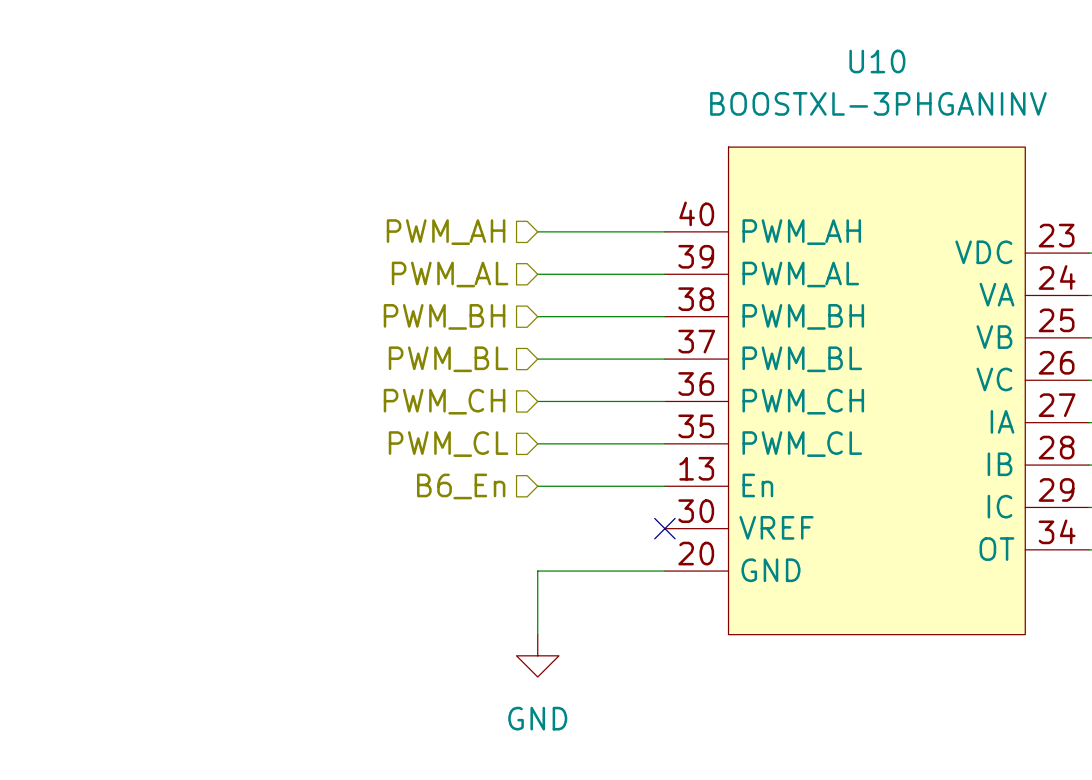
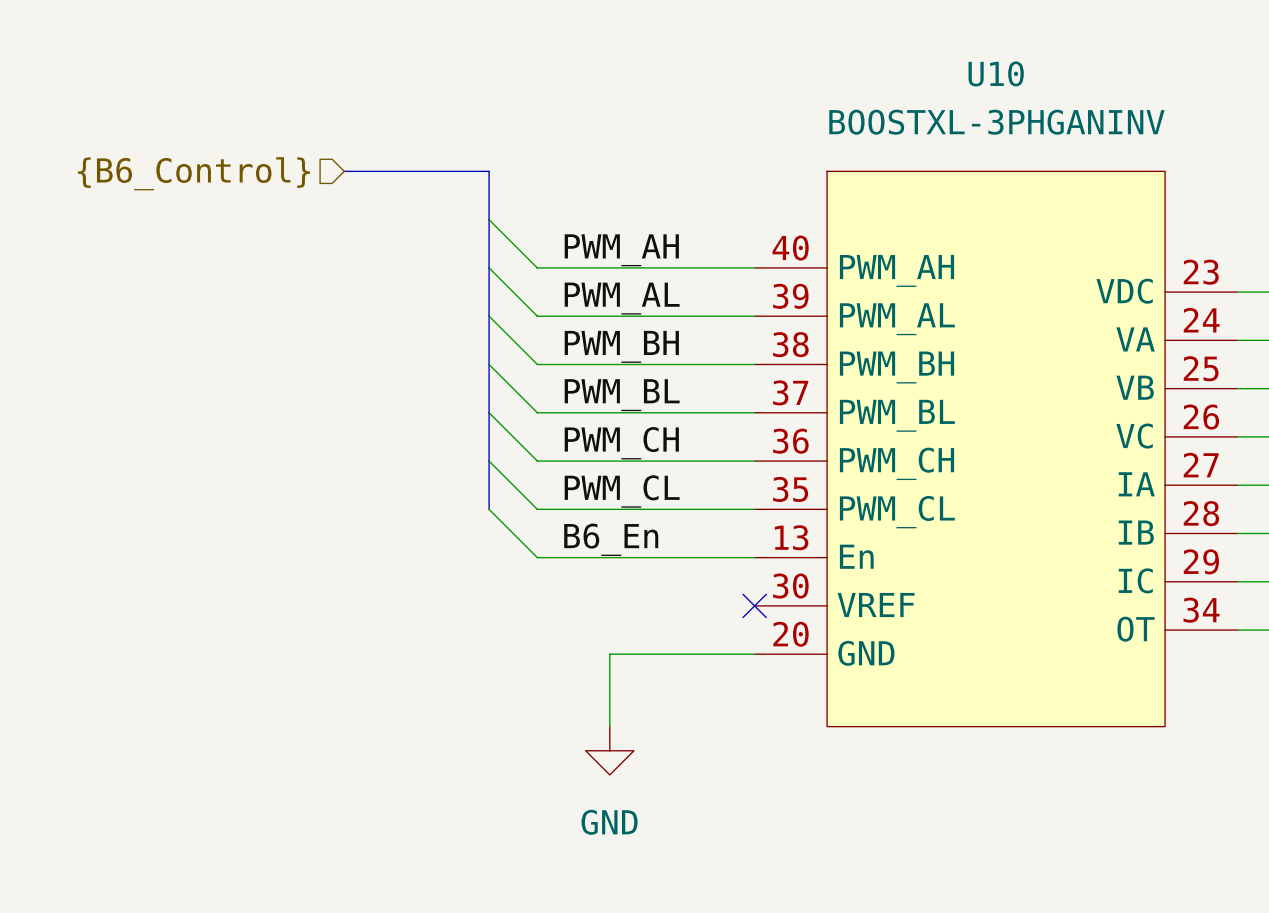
bus: none -> (344, 171) (489, 171) (489, 509)
hierarchical label: none -> {B6_Control} (193, 173)
wire: none -> (489, 219) (537, 267) (609, 267)
label: none -> PWM_AH (621, 250)
wire: none -> (489, 267) (537, 316) (609, 316)
hierarchical label: PWM_AH (446, 232) -> none
label: none -> PWM_AL (622, 298)
wire: none -> (489, 316) (537, 364) (609, 364)
hierarchical label: PWM_AL (450, 274) -> none
label: none -> PWM_BH (621, 346)
wire: none -> (489, 364) (537, 412) (609, 412)
hierarchical label: PWM_BH (444, 316) -> none
label: none -> PWM_BL (622, 395)
wire: none -> (489, 412) (537, 461) (609, 461)
hierarchical label: PWM_BL (448, 359) -> none
label: none -> PWM_CH (621, 443)
wire: none -> (489, 461) (537, 509) (609, 509)
hierarchical label: PWM_CH (444, 401) -> none
label: none -> PWM_CL (622, 491)
wire: none -> (489, 509) (537, 557) (609, 557)
hierarchical label: PWM_CL (448, 444) -> none
label: none -> B6_En (611, 539)
hierarchical label: B6_En (461, 486) -> none

